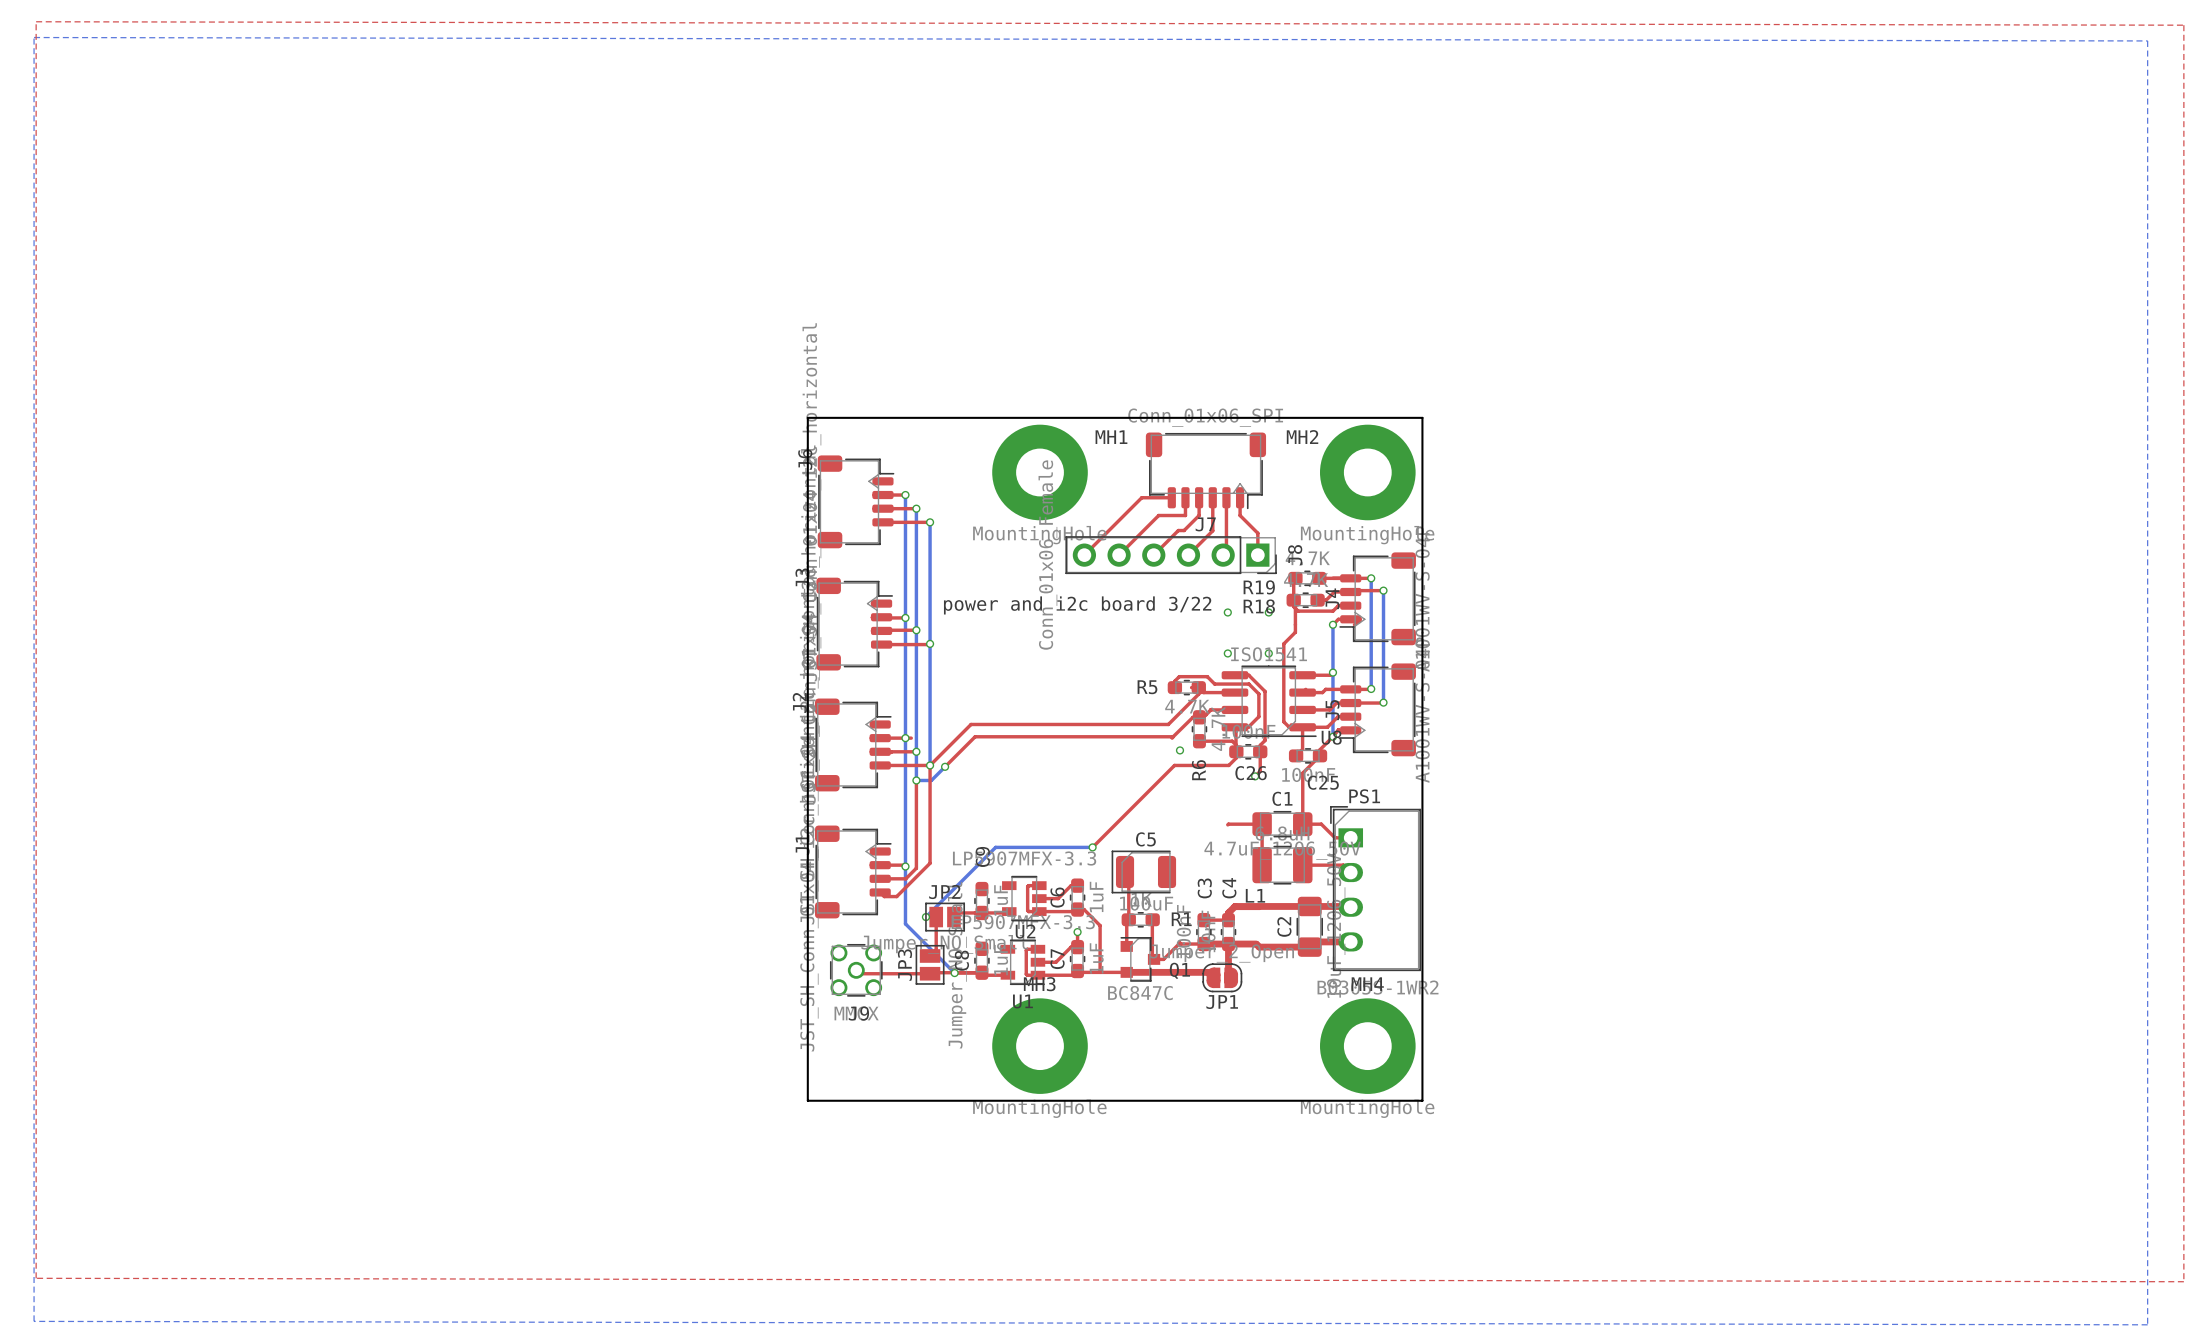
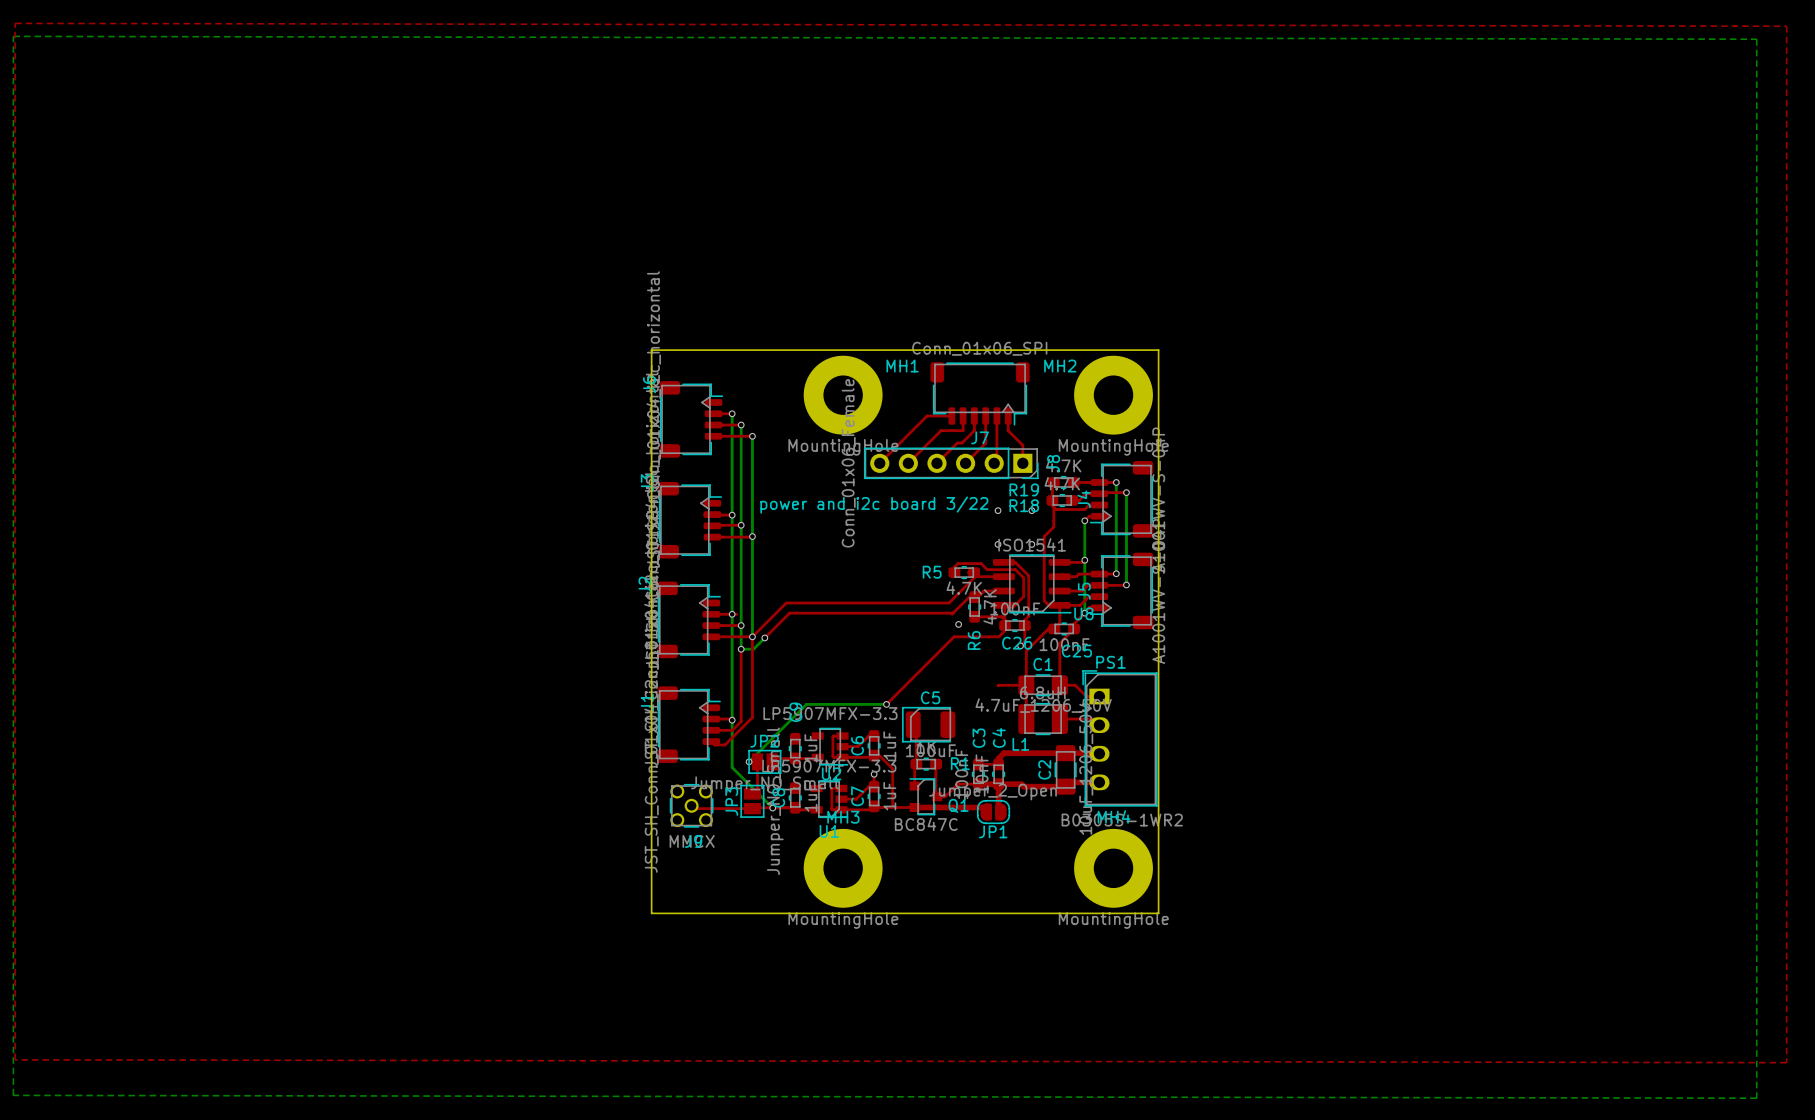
top track: none -> (1054, 628) (1048, 628) (1026, 651) (1026, 685)

